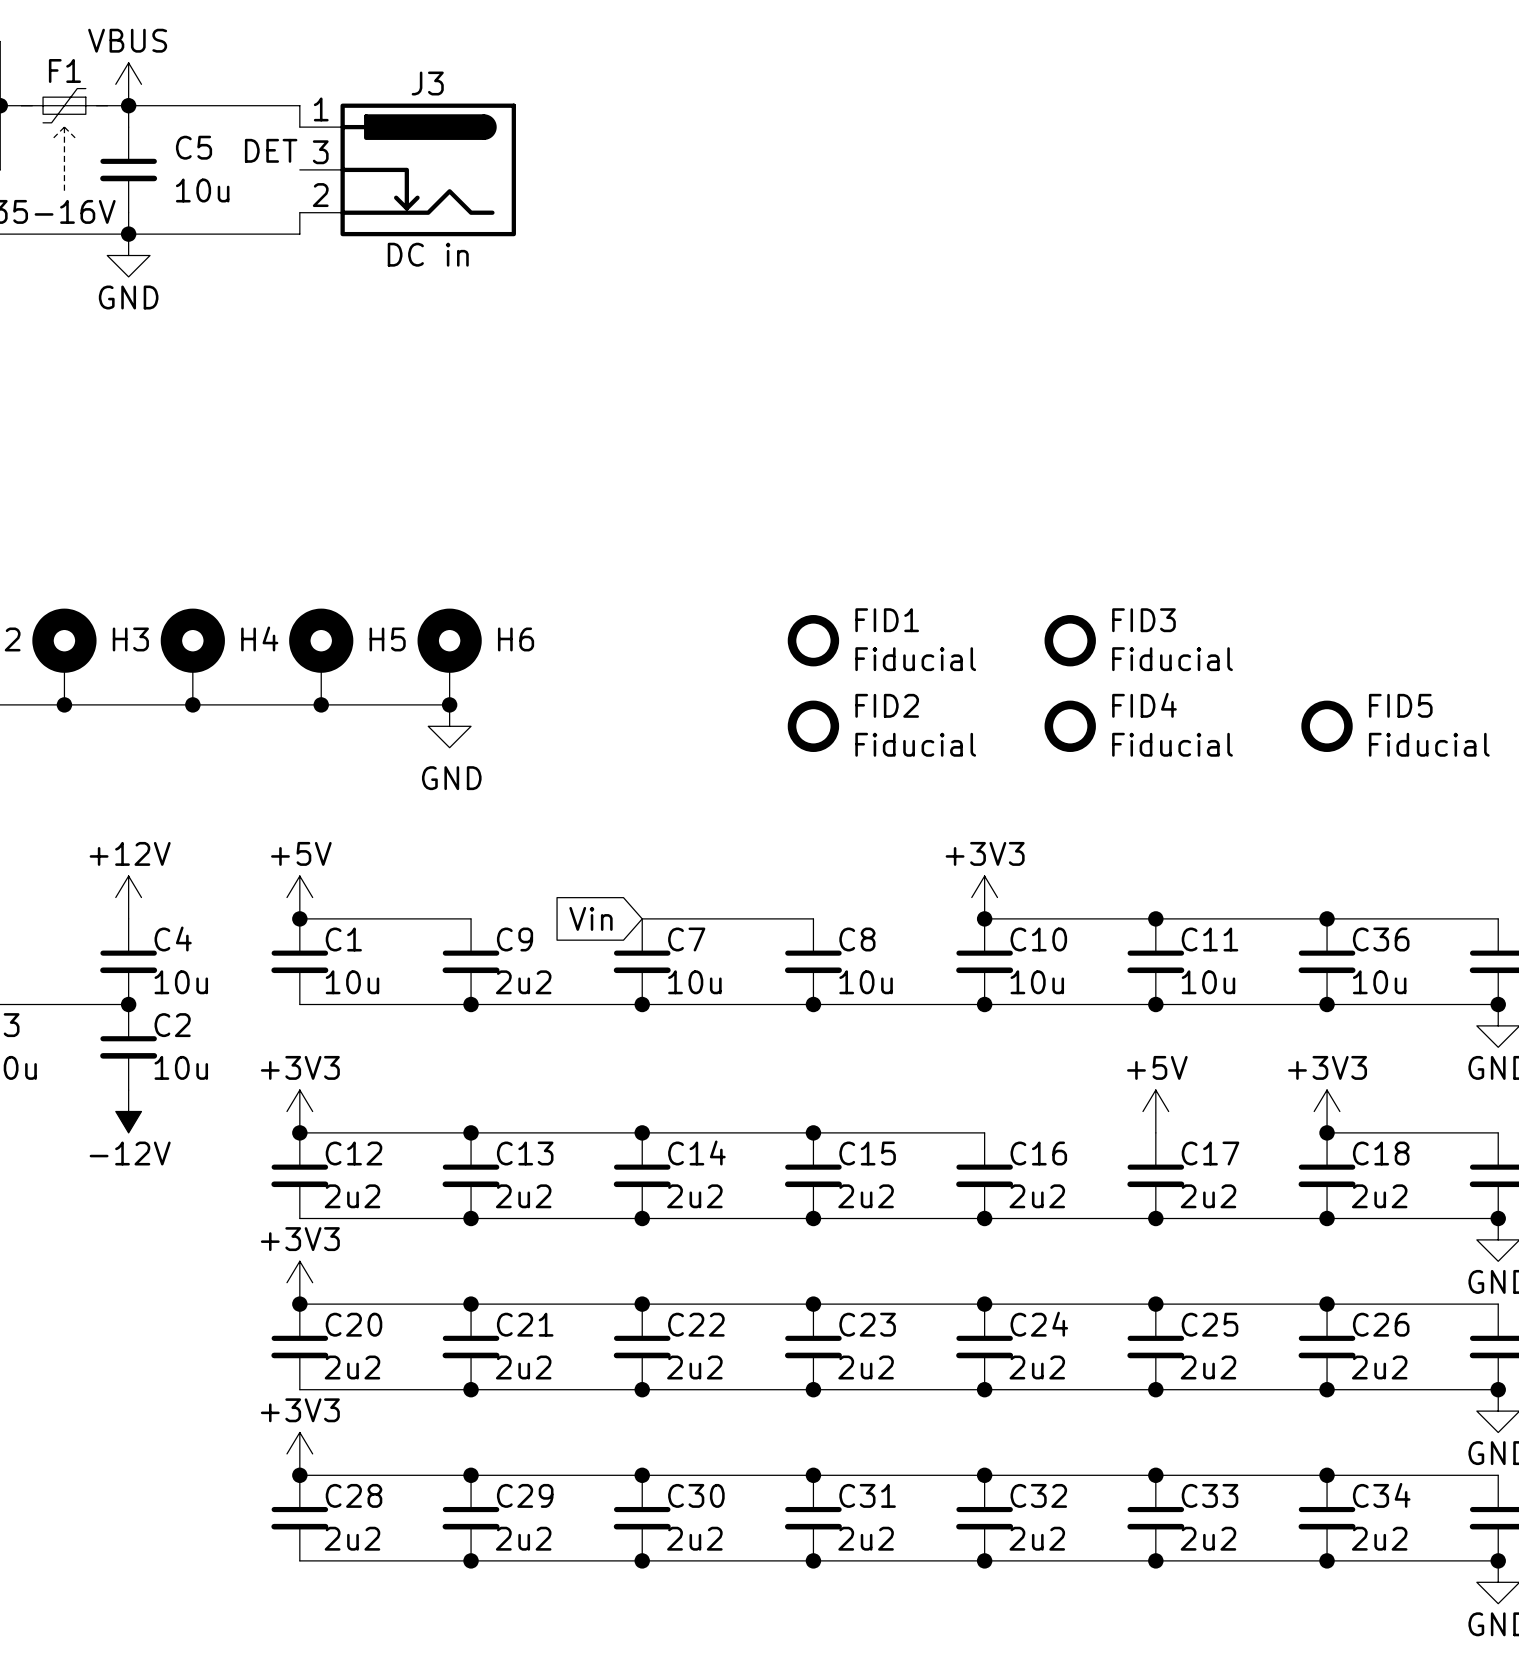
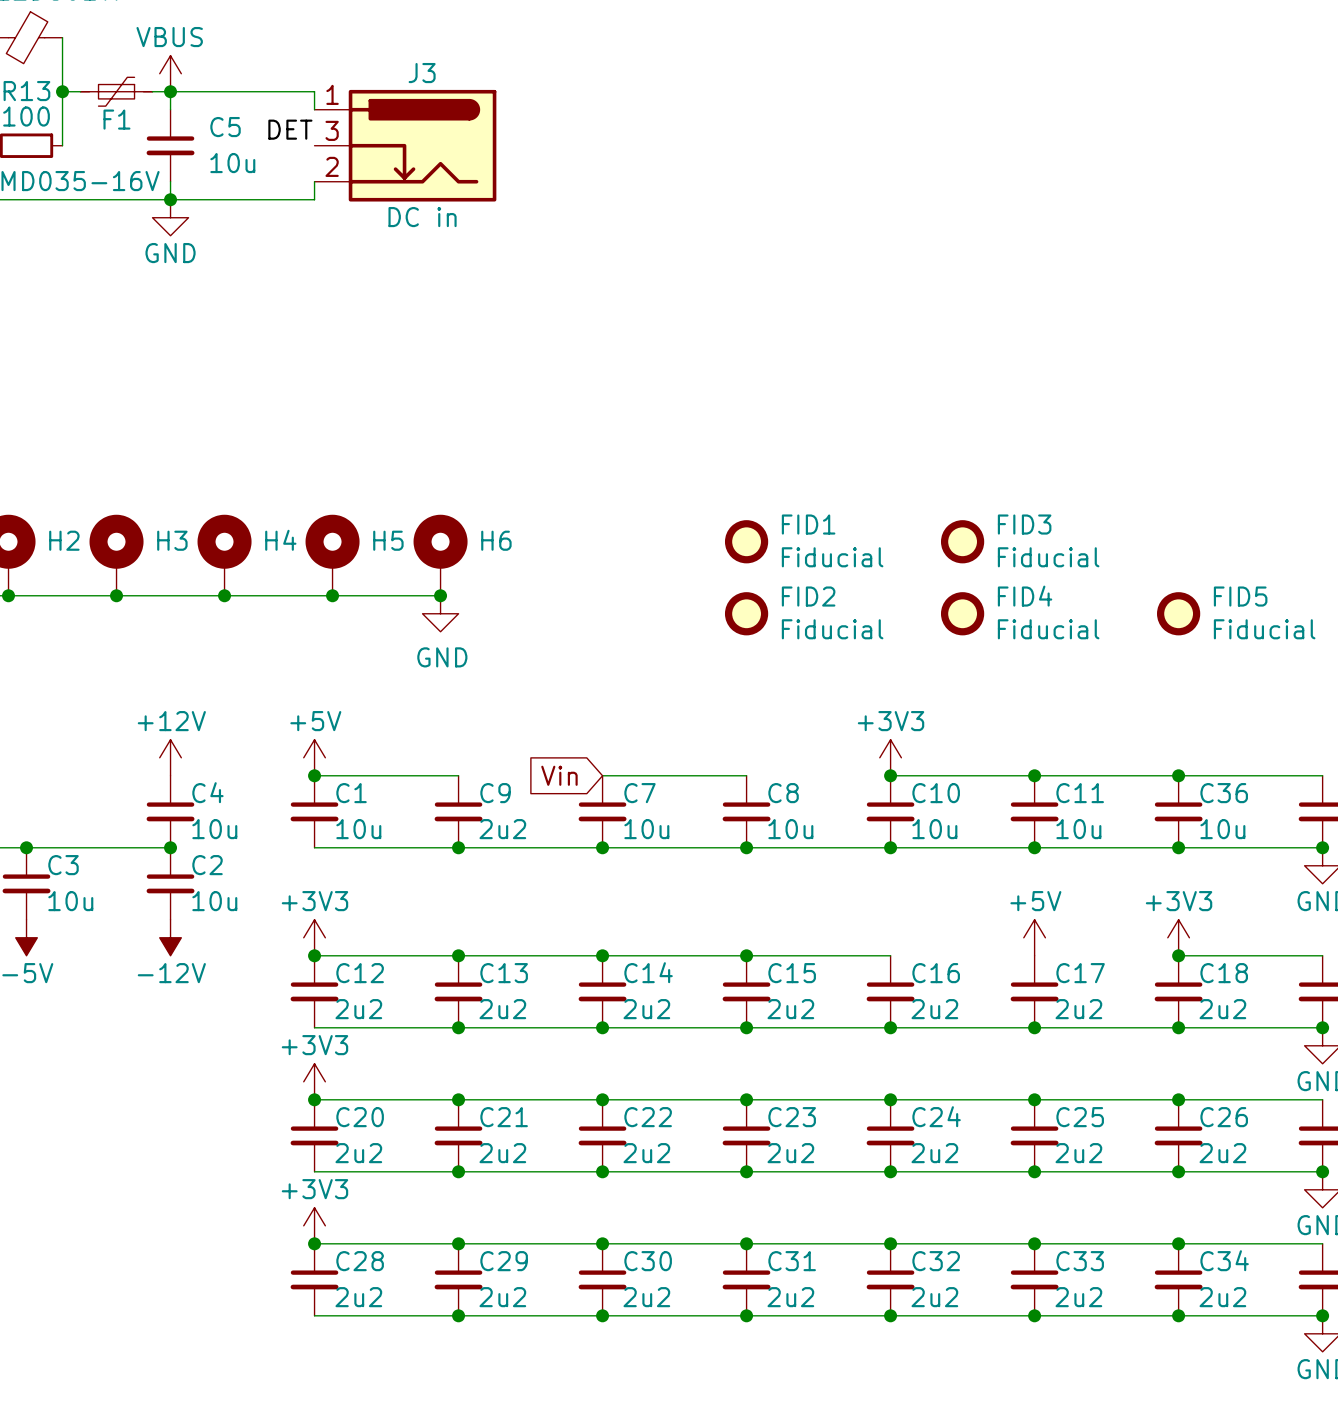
F1 name position: F1 (64, 70) -> F1 (116, 119)
line: (64, 127) (53, 137) -> none
line: (64, 127) (75, 137) -> none
line: (64, 127) (64, 191) -> none

